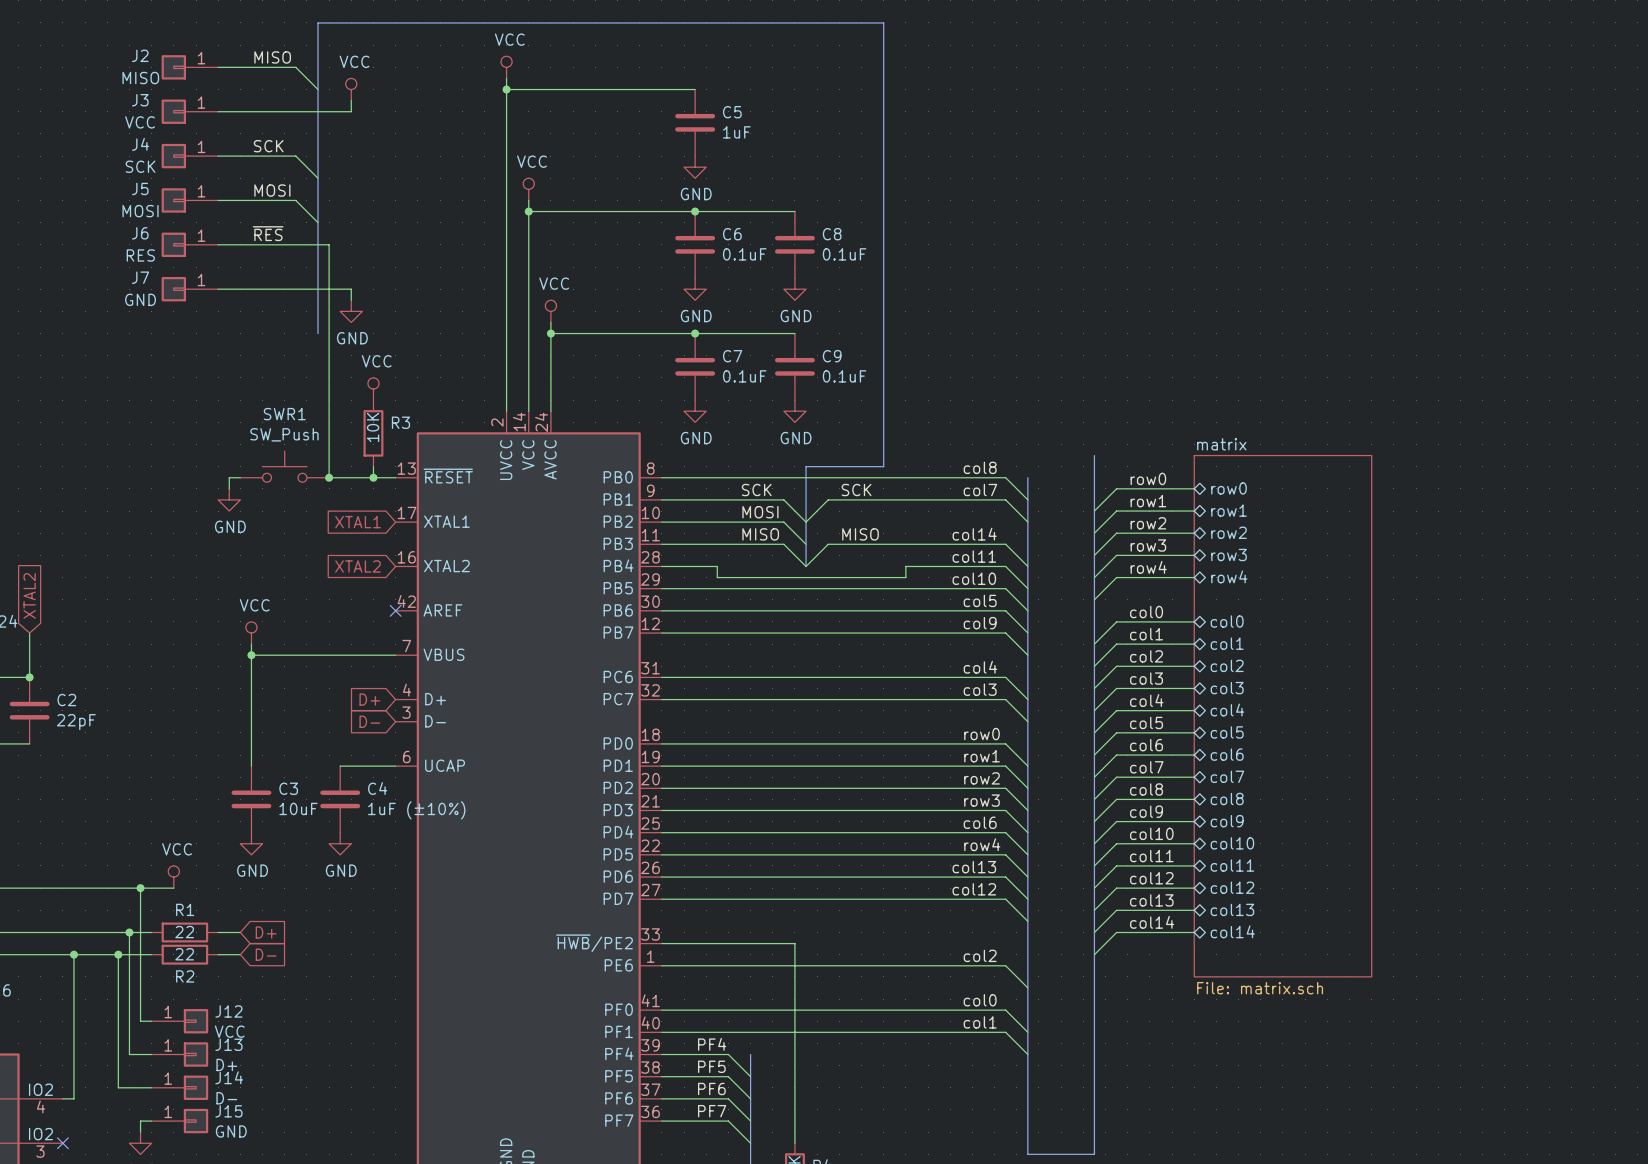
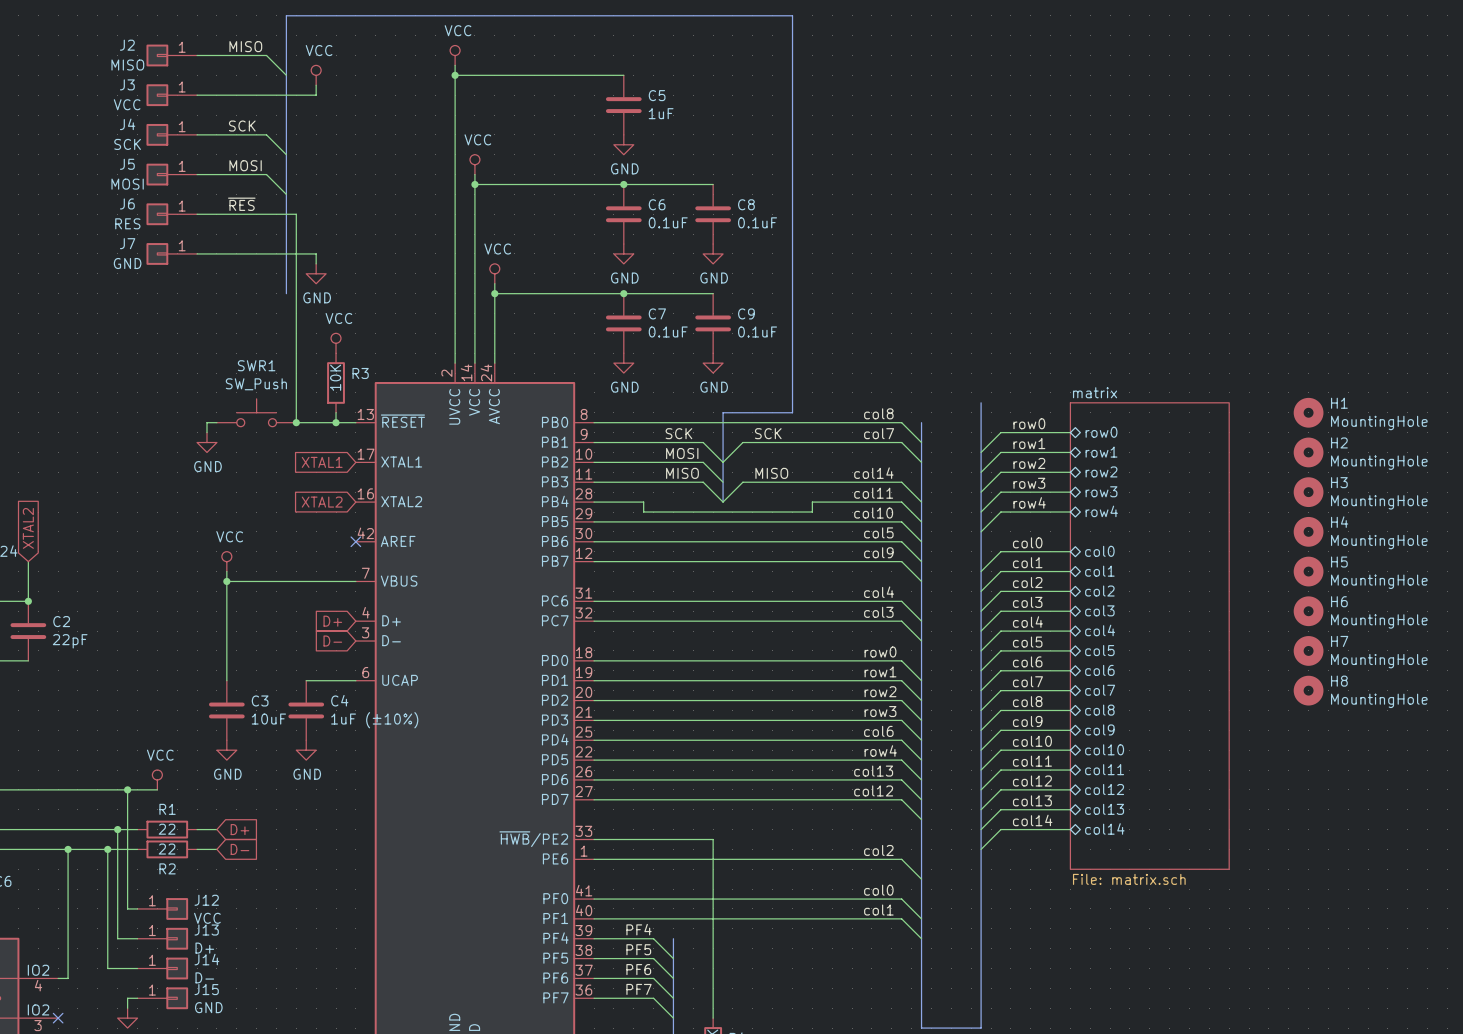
H1: none -> MountingHole (1308, 412)
H2: none -> MountingHole (1308, 452)
H3: none -> MountingHole (1308, 492)
H4: none -> MountingHole (1308, 531)
H5: none -> MountingHole (1308, 571)
H6: none -> MountingHole (1308, 611)
H7: none -> MountingHole (1308, 650)
H8: none -> MountingHole (1308, 690)

